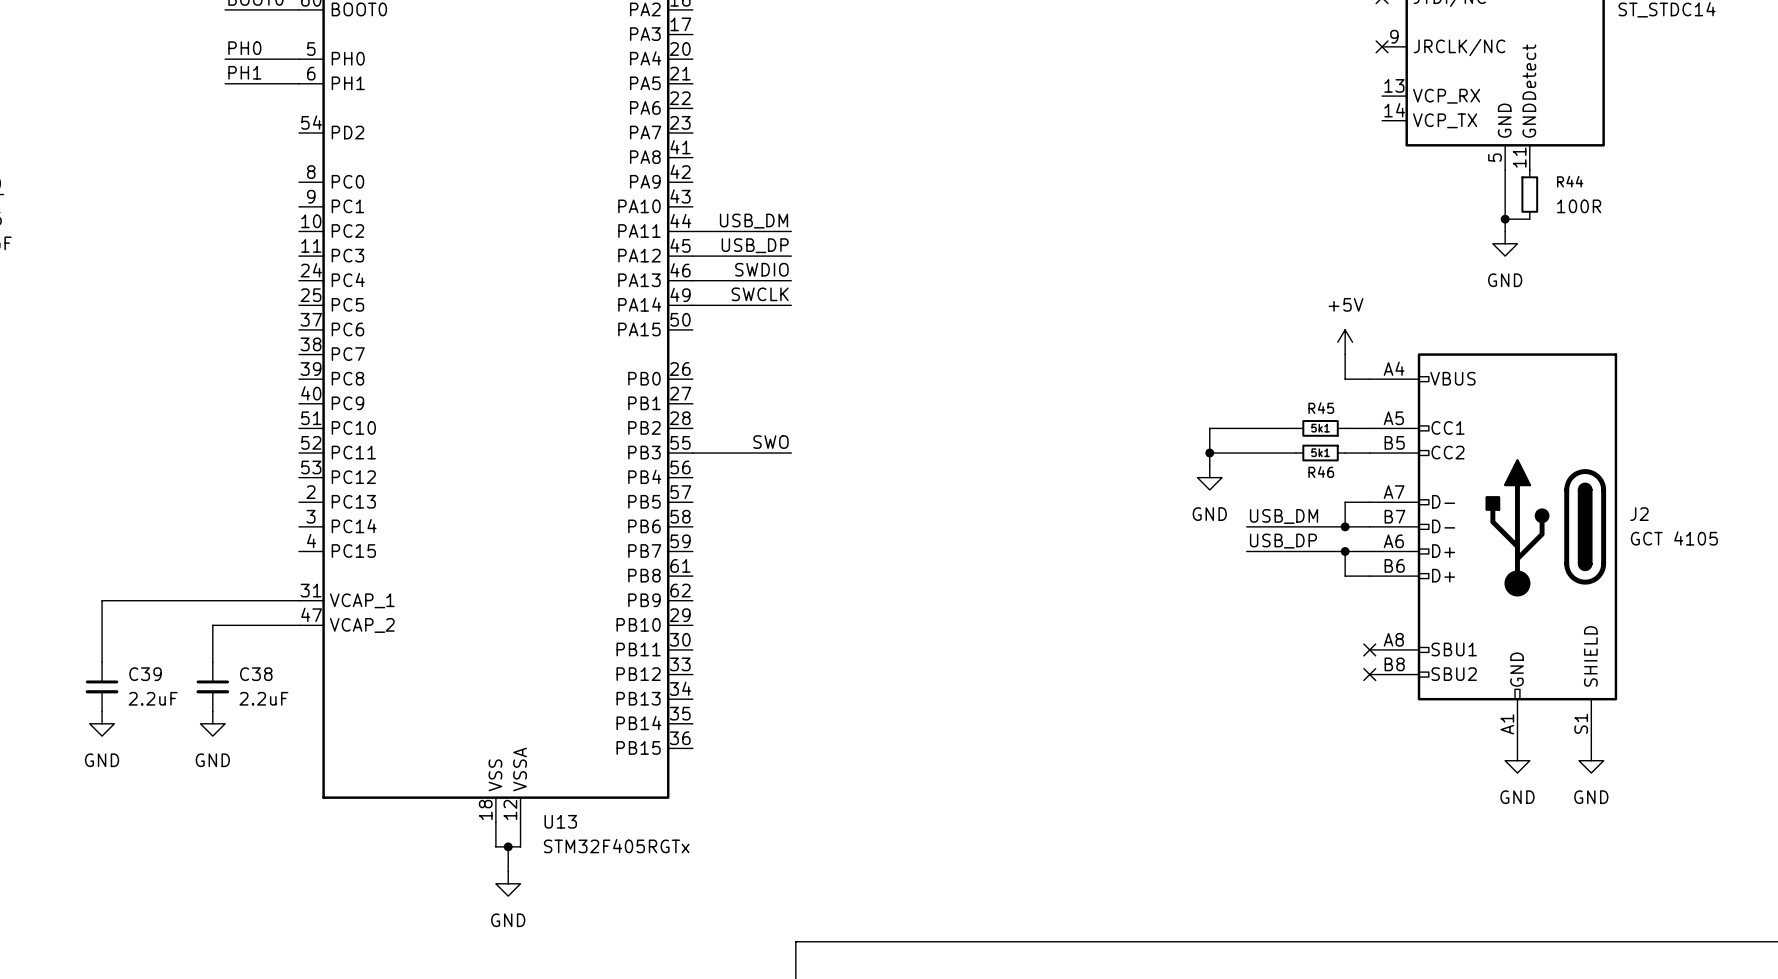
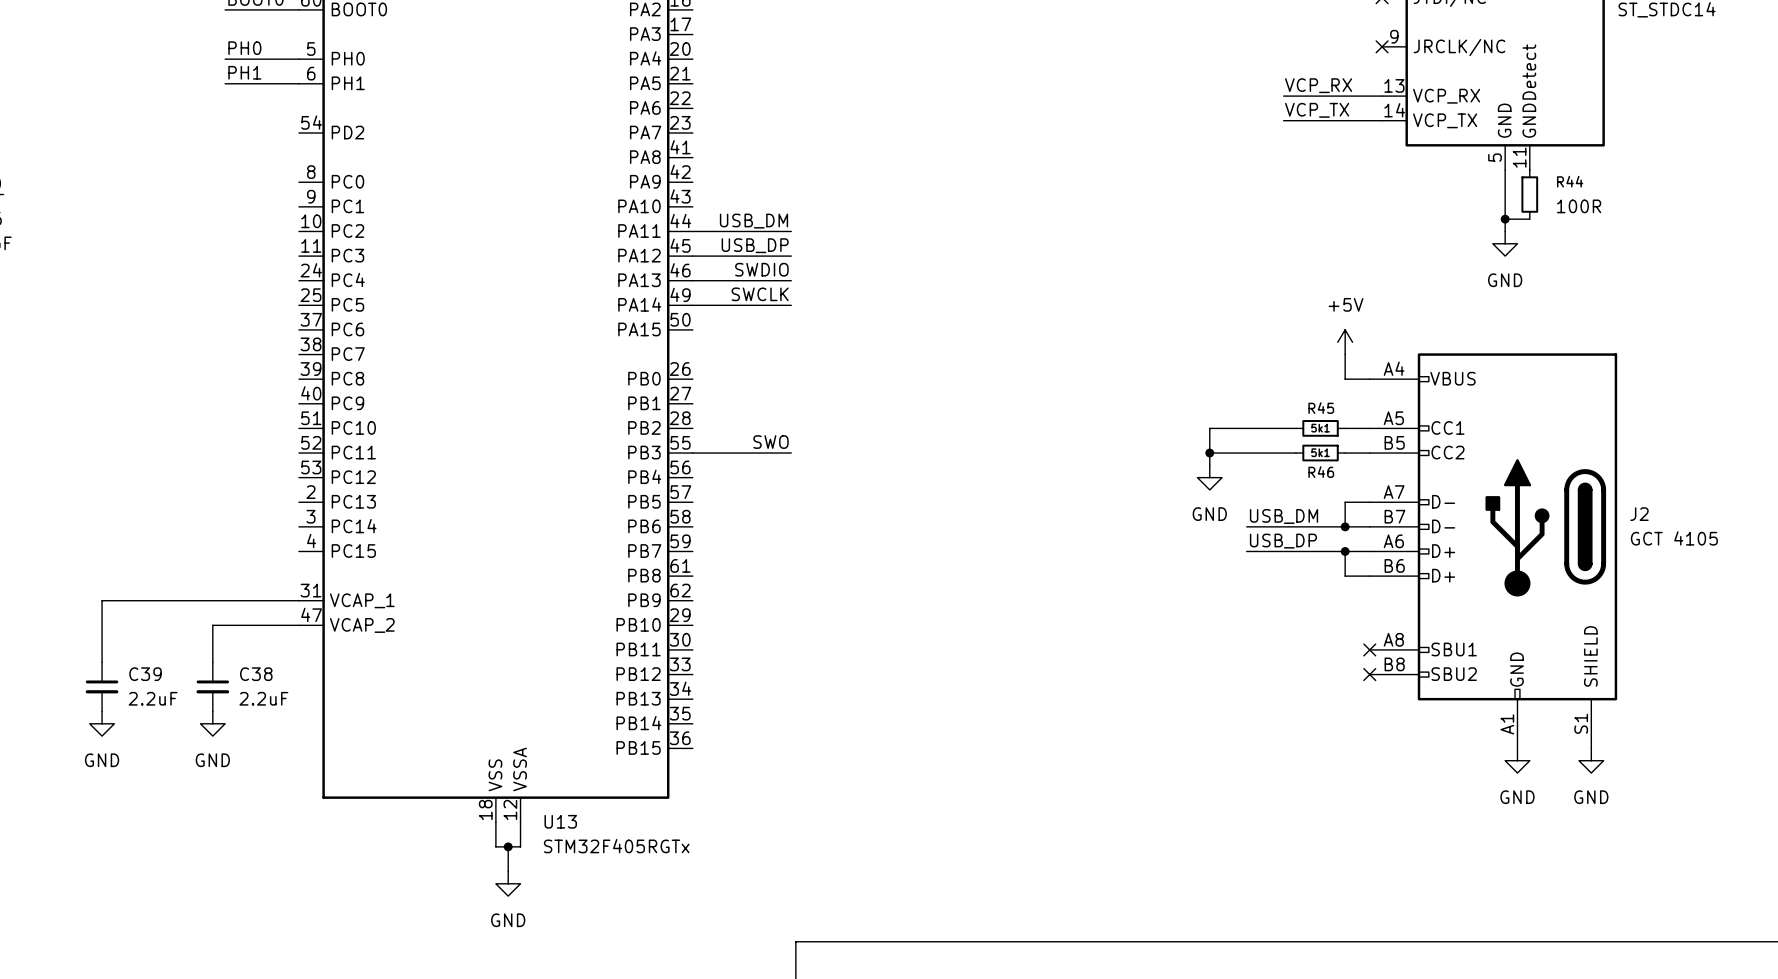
label: none -> VCP_RX (1318, 85)
wire: none -> (1283, 96) (1382, 96)
label: none -> VCP_TX (1317, 110)
wire: none -> (1283, 120) (1382, 120)

